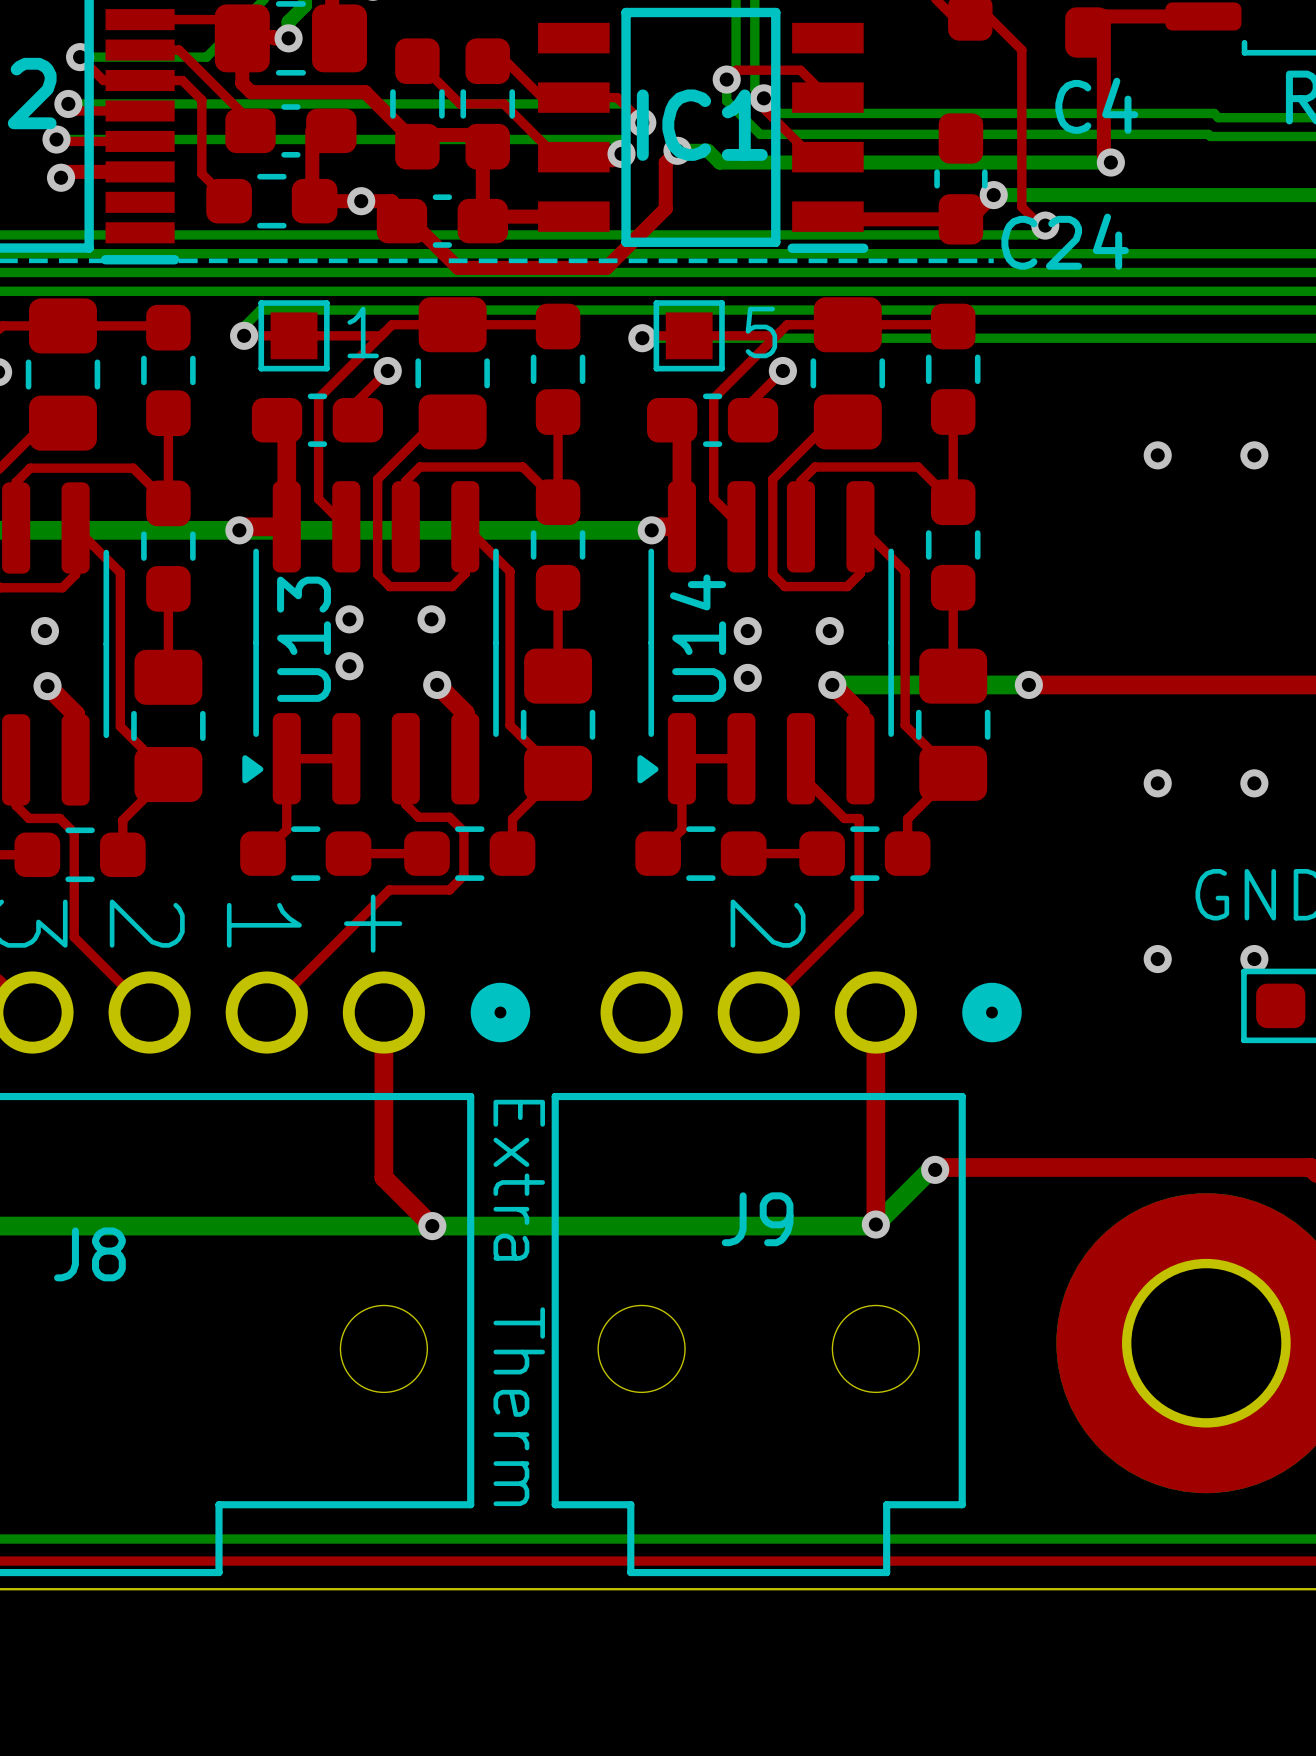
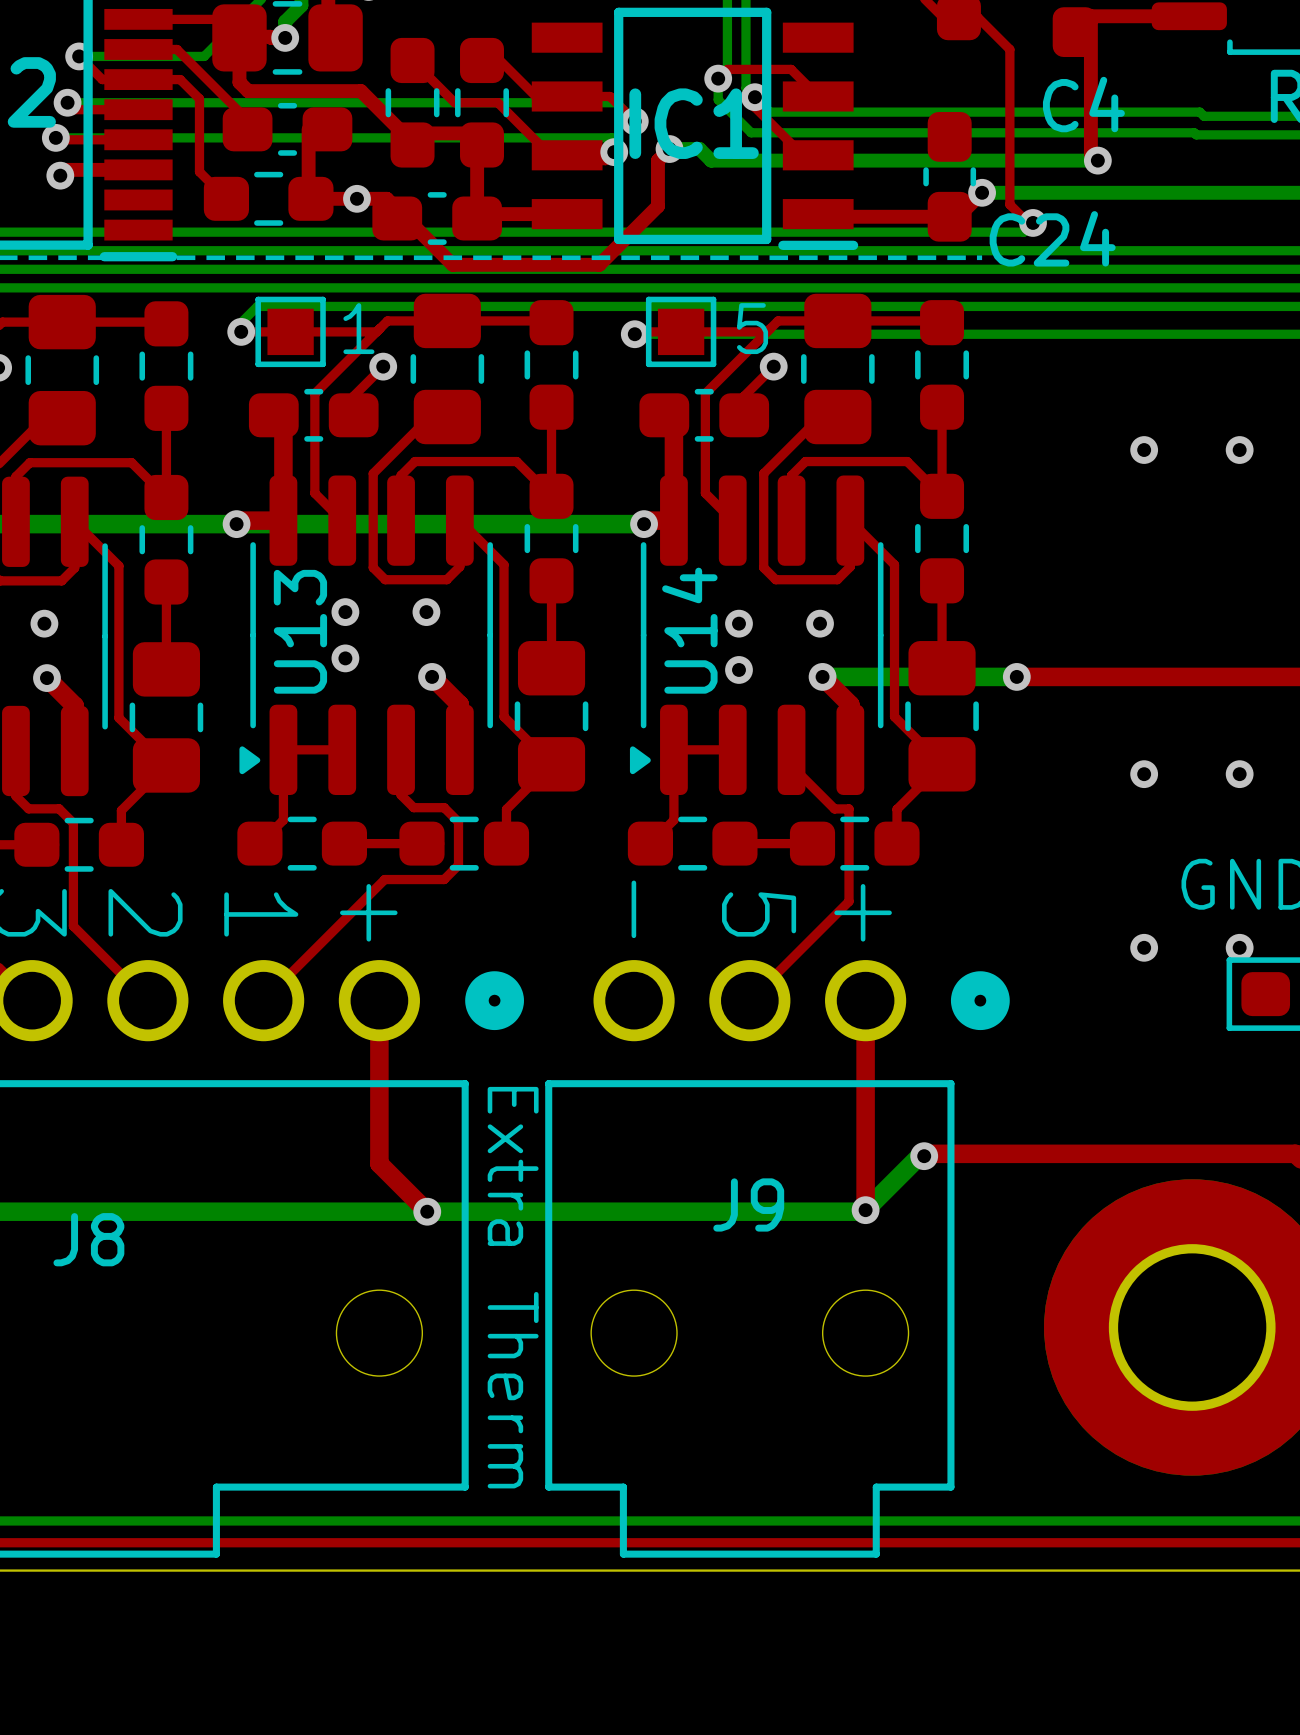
text: none -> - (633, 909)
text: 2 (768, 923) -> 5 (759, 914)
text: none -> + (863, 912)

